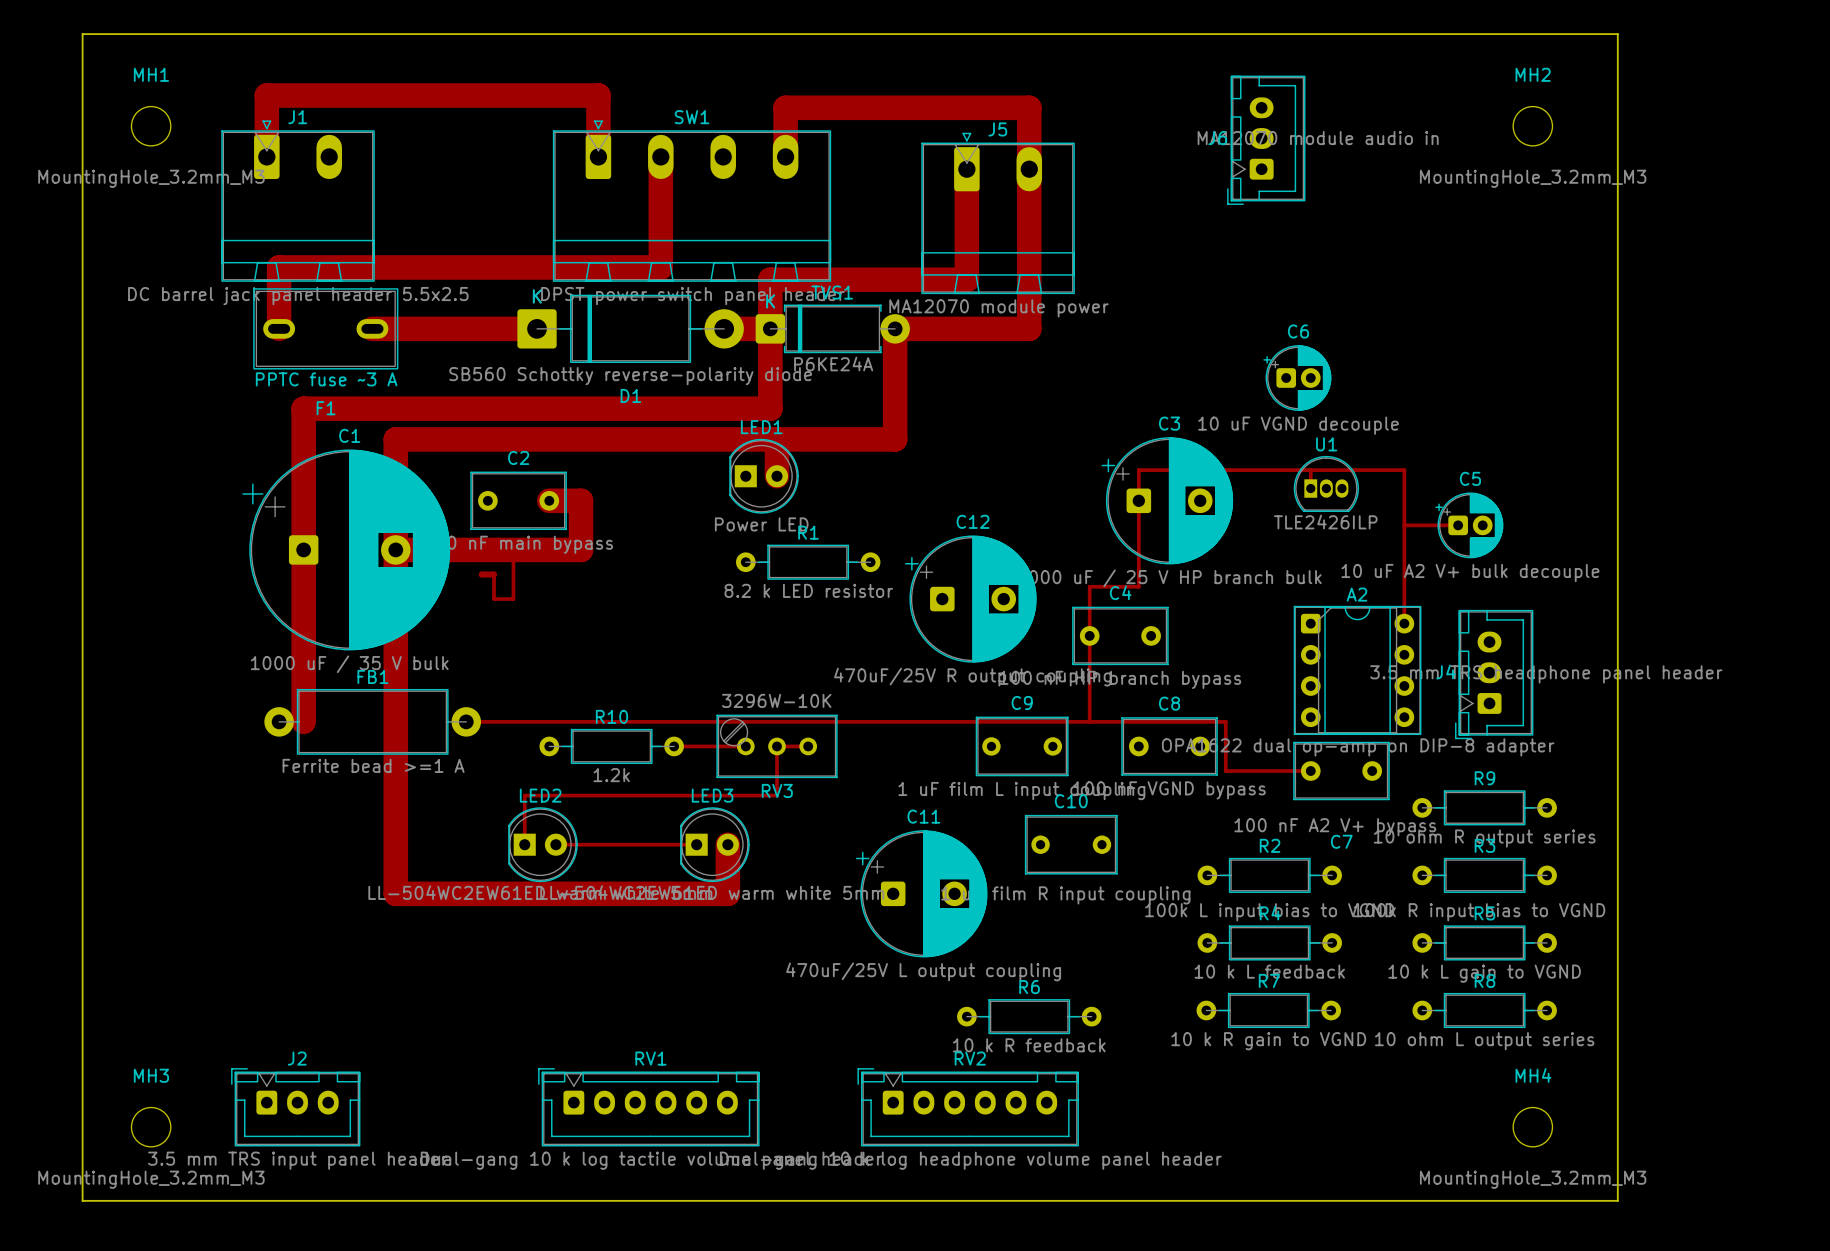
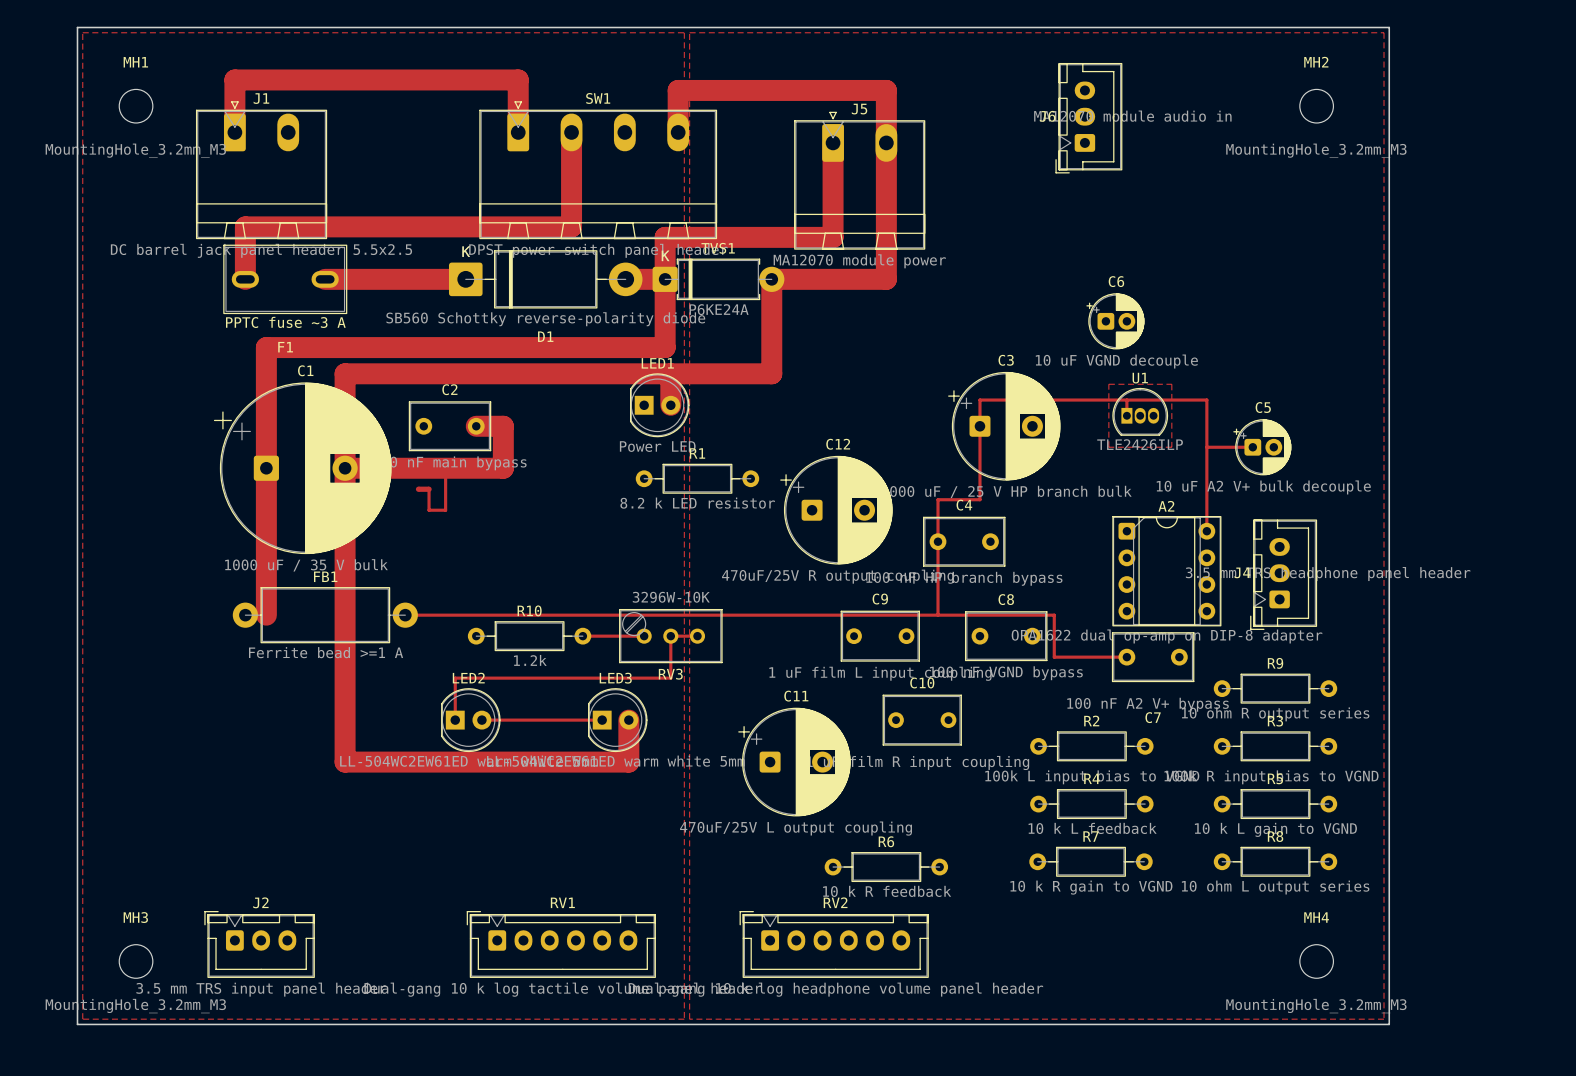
zone outline: none -> (82, 32) (684, 32) (684, 1019) (82, 1019) (82, 32)
zone outline: none -> (689, 32) (1384, 32) (1384, 1019) (689, 1019) (689, 32)
zone outline: none -> (1108, 384) (1171, 384) (1171, 447) (1108, 447) (1108, 384)

